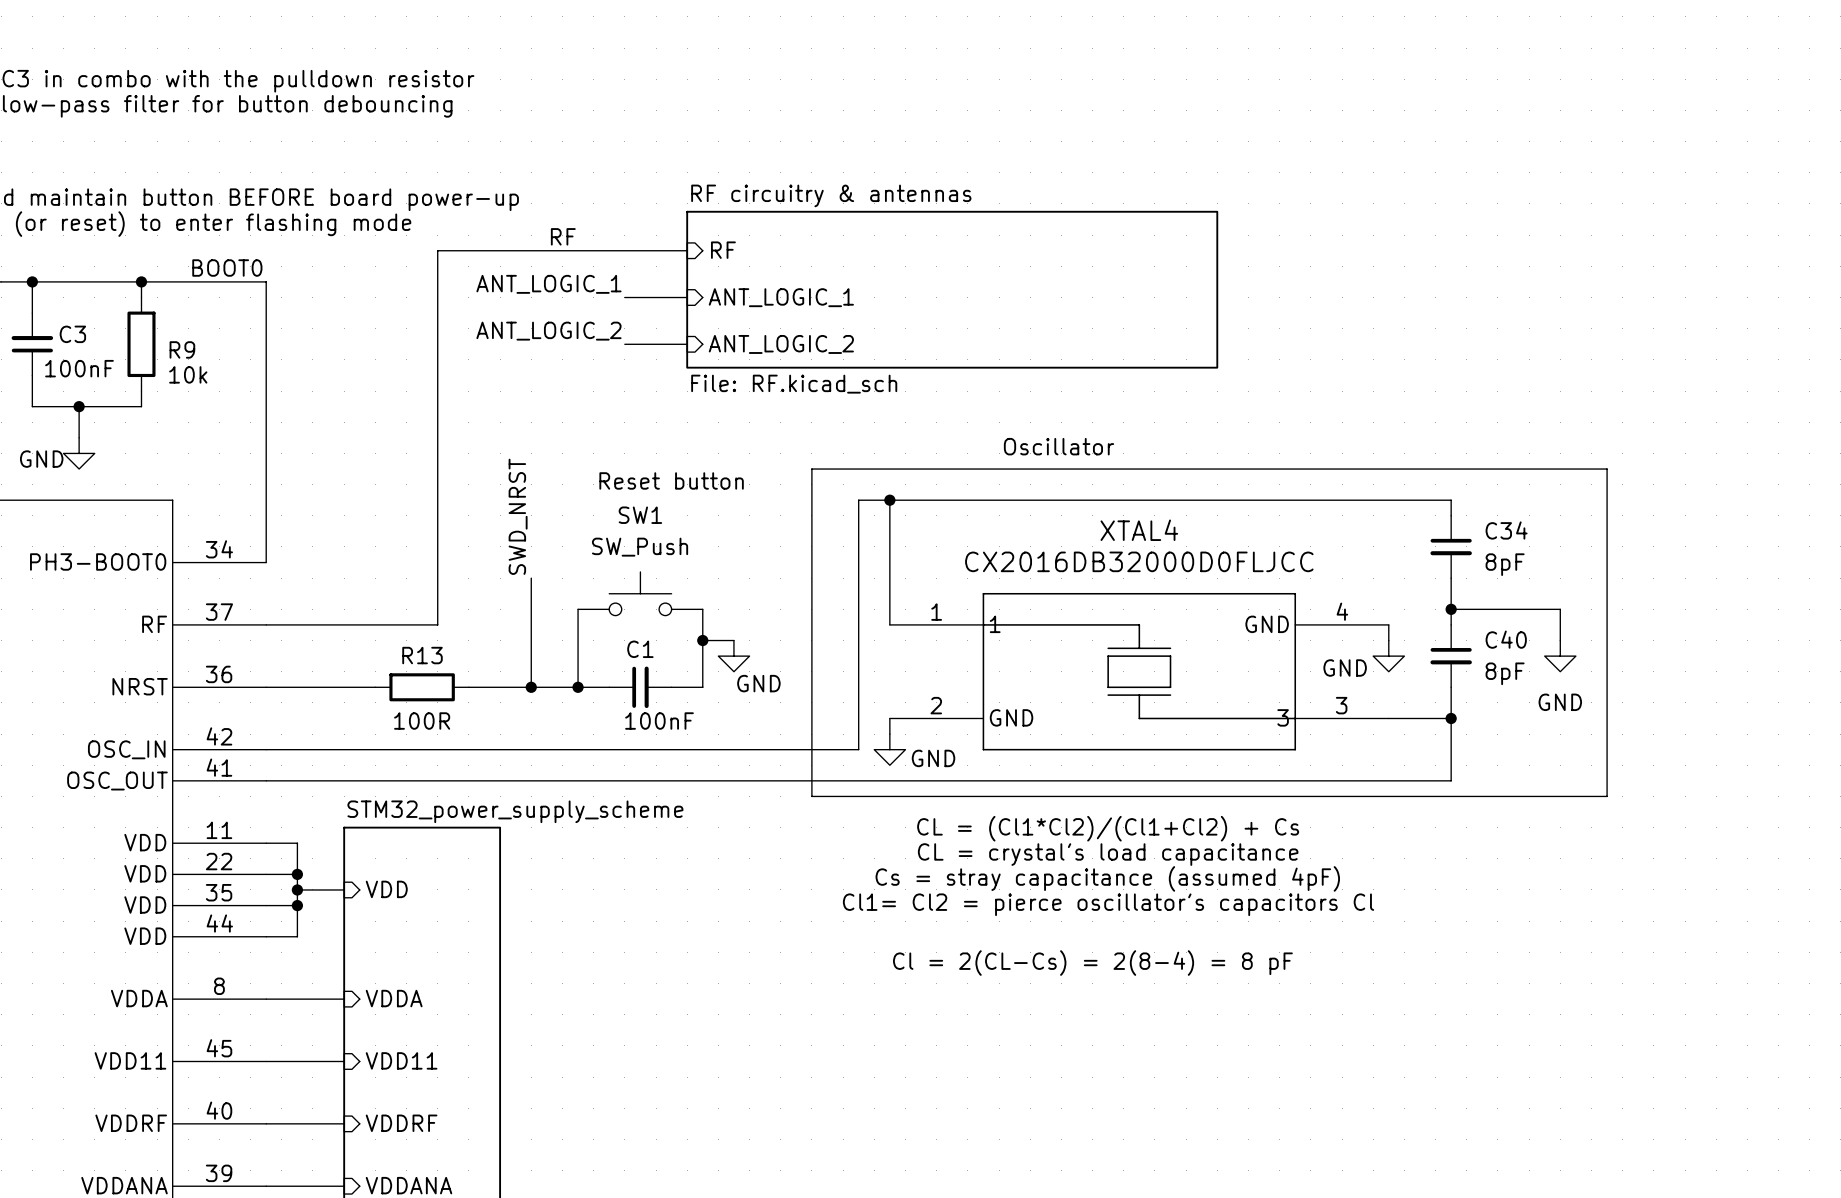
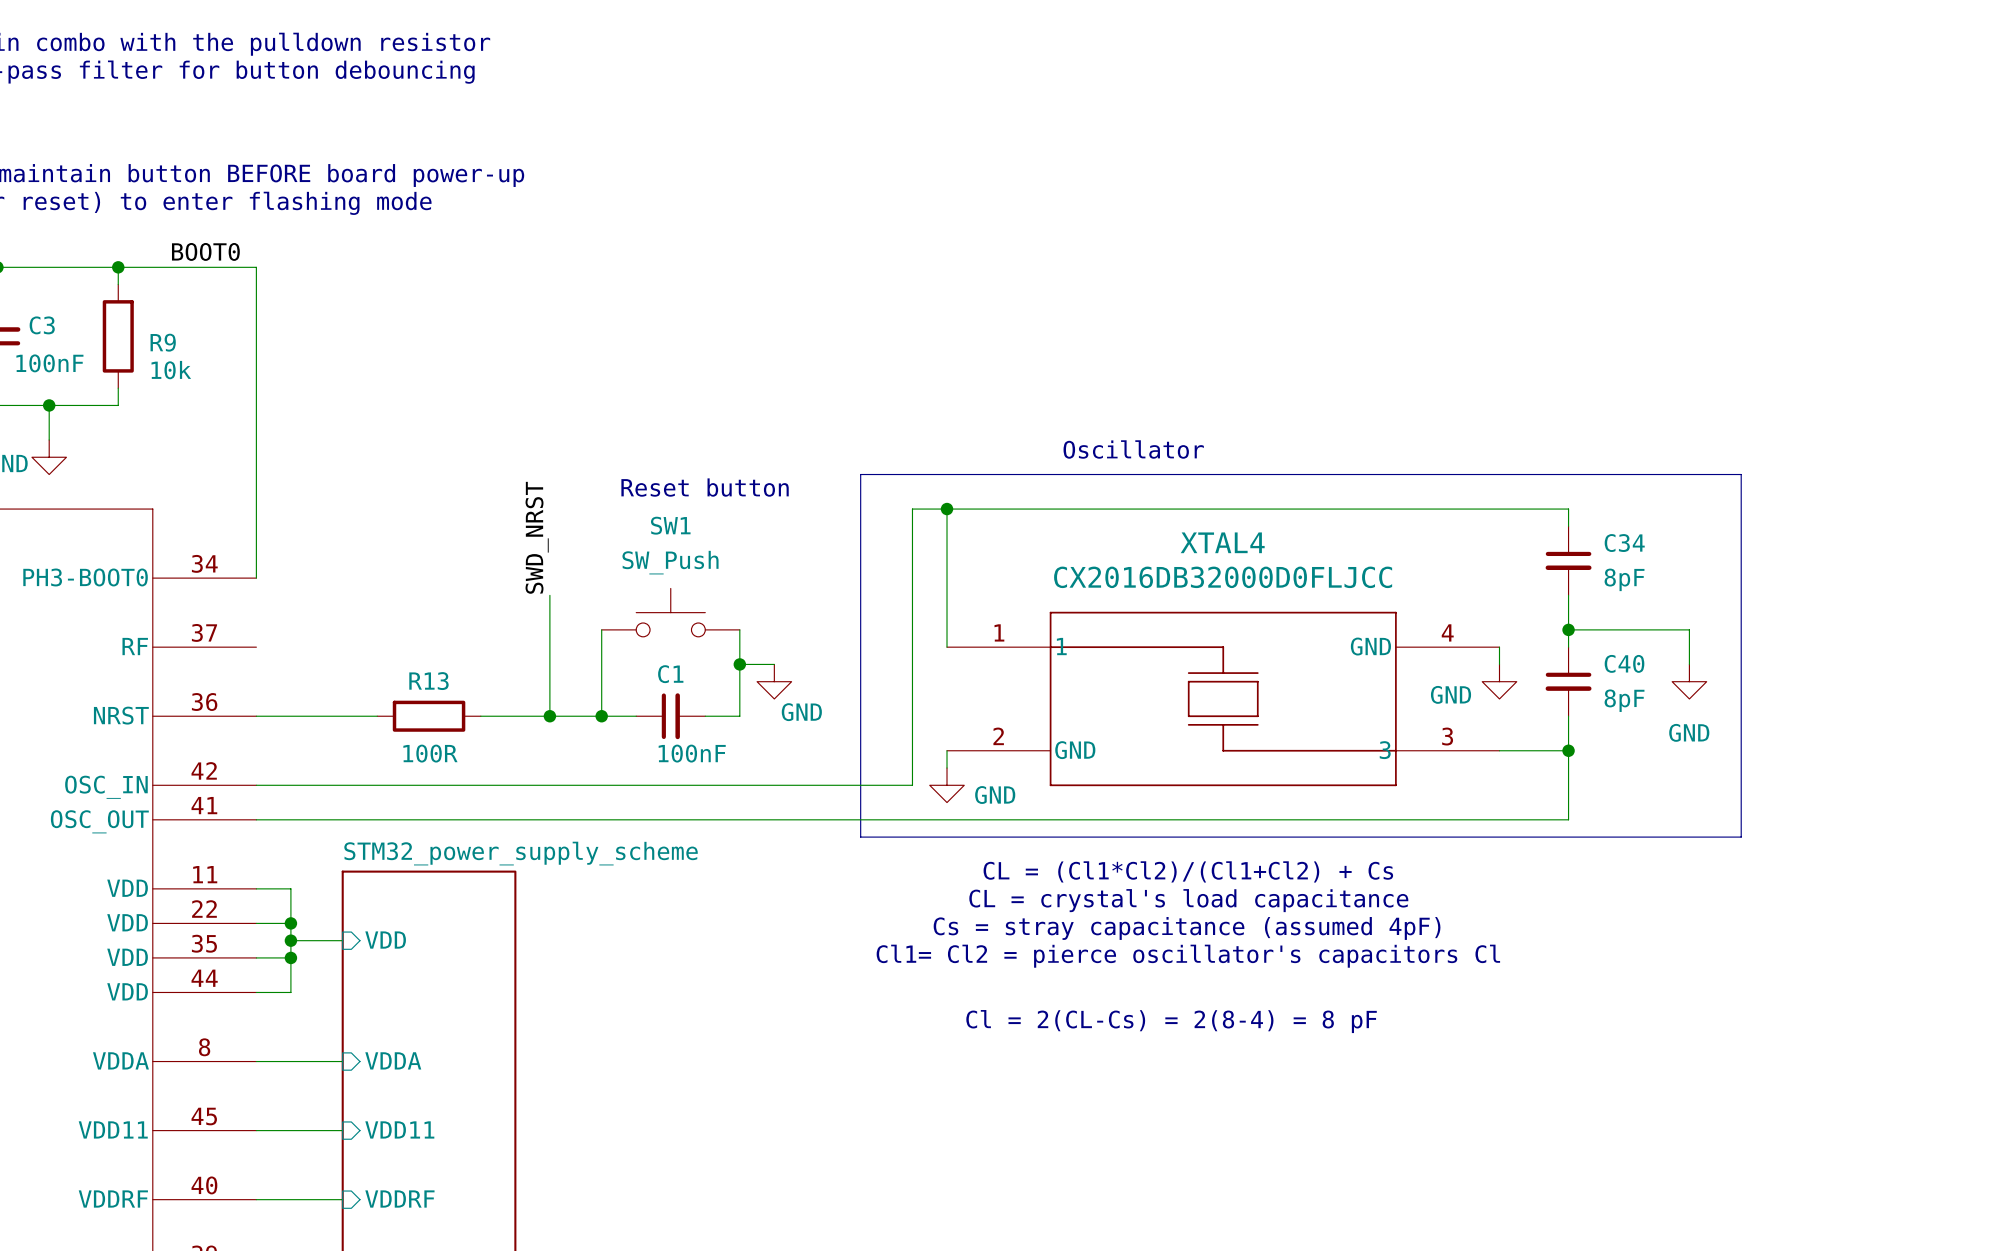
label: RF (563, 236) -> none
wire: (687, 250) (437, 250) (437, 624) (266, 624) -> none
sheet pin: RF (723, 250) -> none
label: ANT_LOGIC_1 (548, 284) -> none
sheet RF circuitry & antennas: File: RF.kicad_sch (952, 289) -> none
wire: (624, 297) (687, 297) -> none
sheet pin: ANT_LOGIC_1 (781, 297) -> none
label: ANT_LOGIC_2 (548, 331) -> none
wire: (624, 344) (687, 344) -> none
sheet pin: ANT_LOGIC_2 (781, 344) -> none

